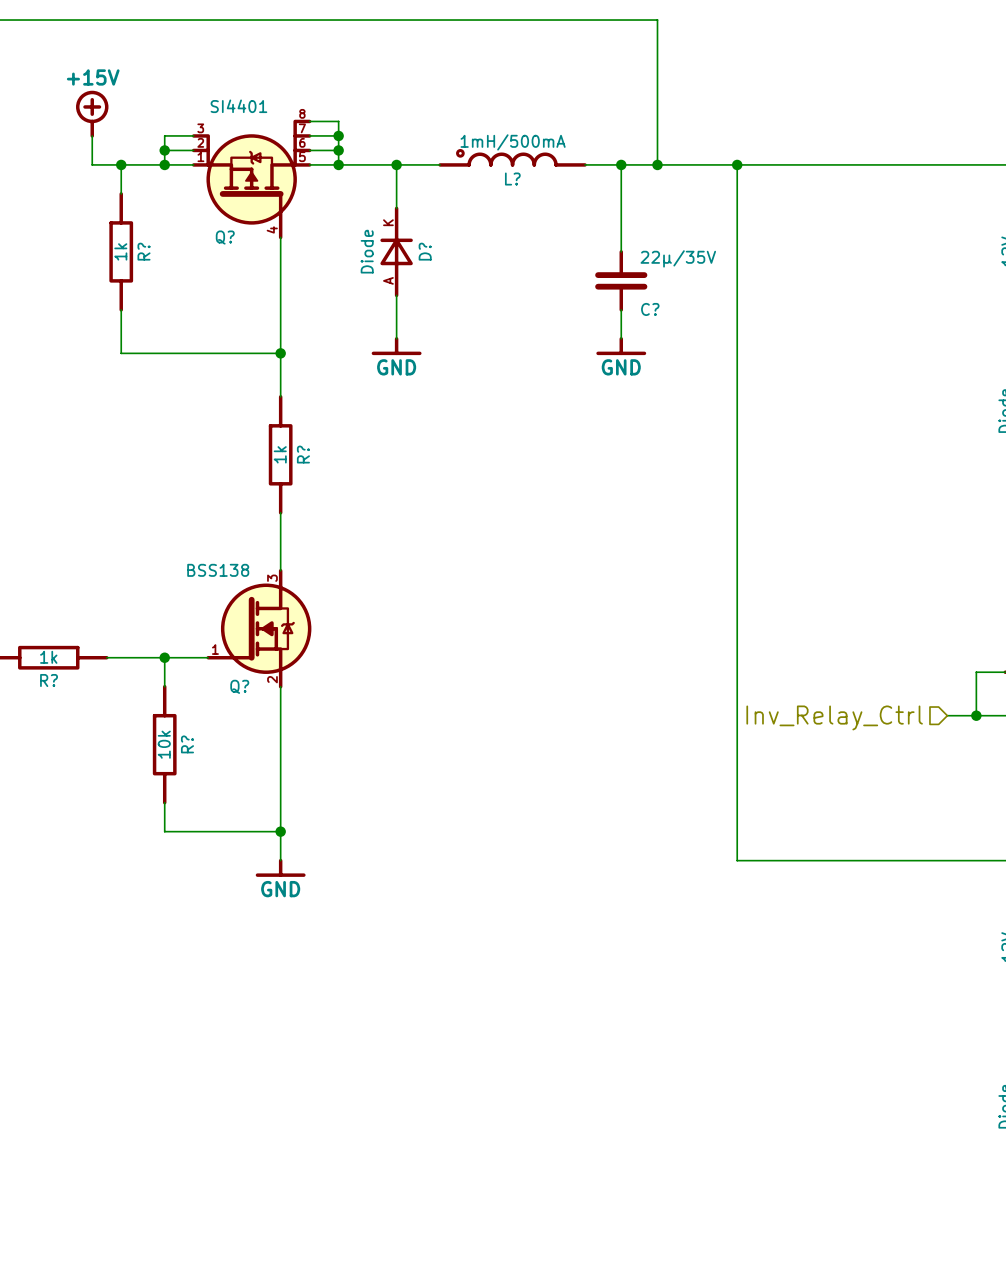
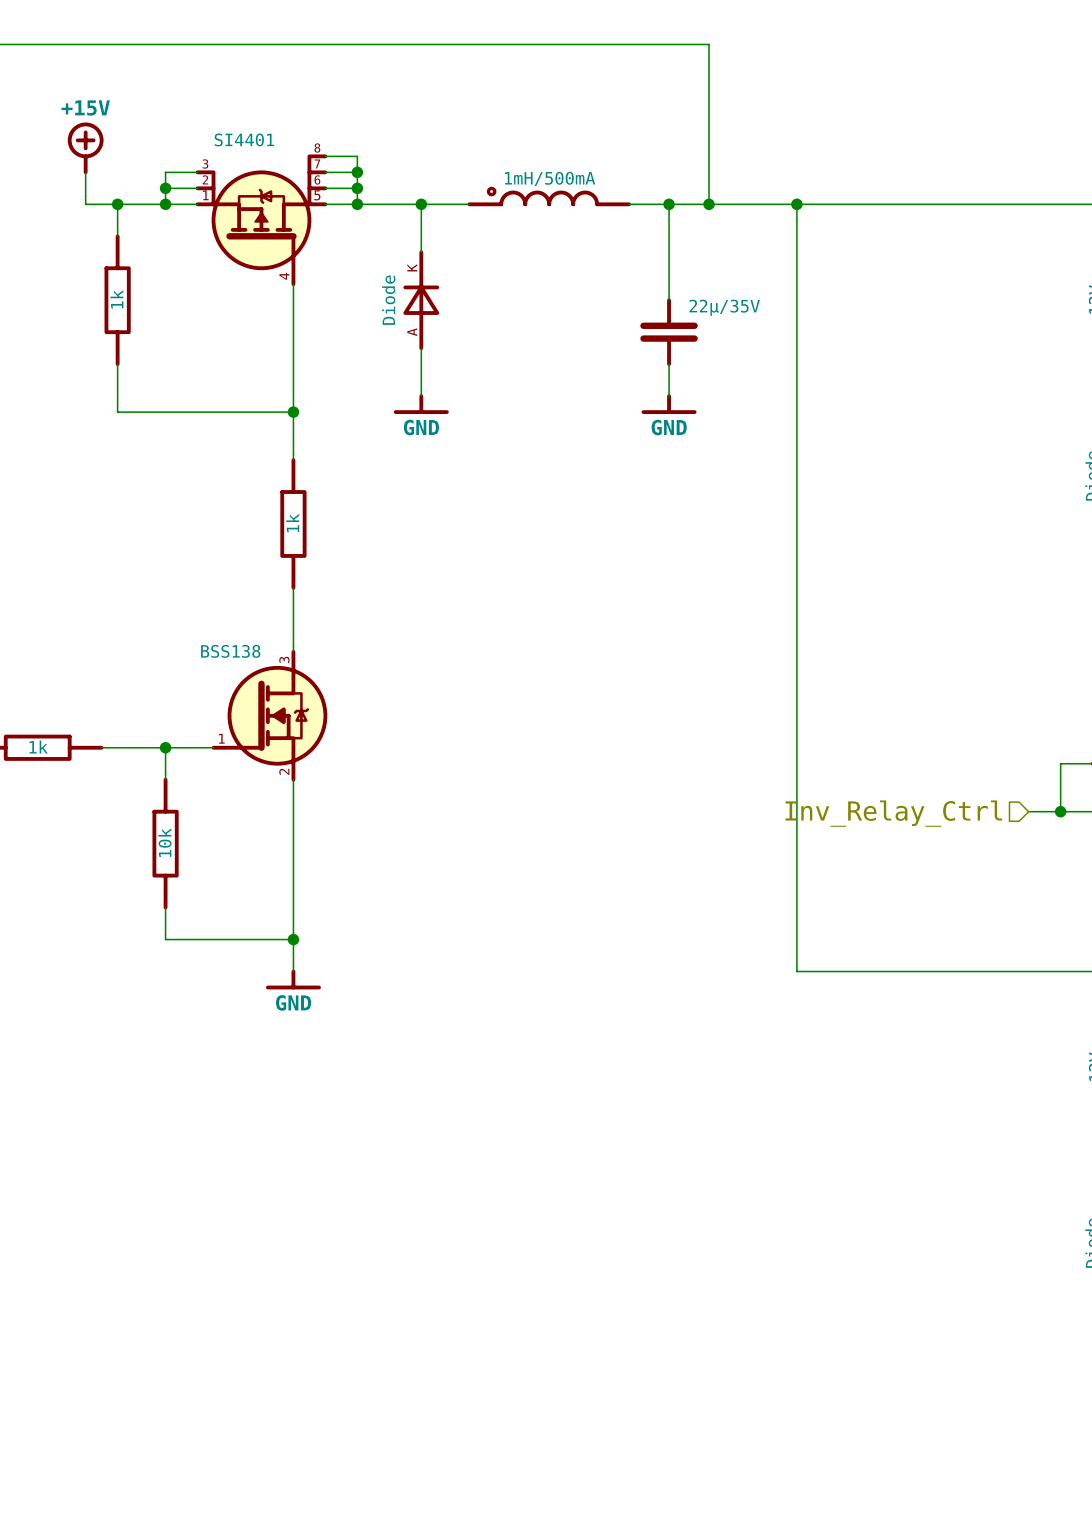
L? name: L? (512, 179) -> none
Q? name: Q? (225, 237) -> none
R? name: R? (144, 251) -> none
D? name: D? (425, 251) -> none
C? name: C? (650, 309) -> none
R? name: R? (303, 454) -> none
R? name: R? (49, 680) -> none
Q? name: Q? (239, 686) -> none
R? name: R? (187, 744) -> none

